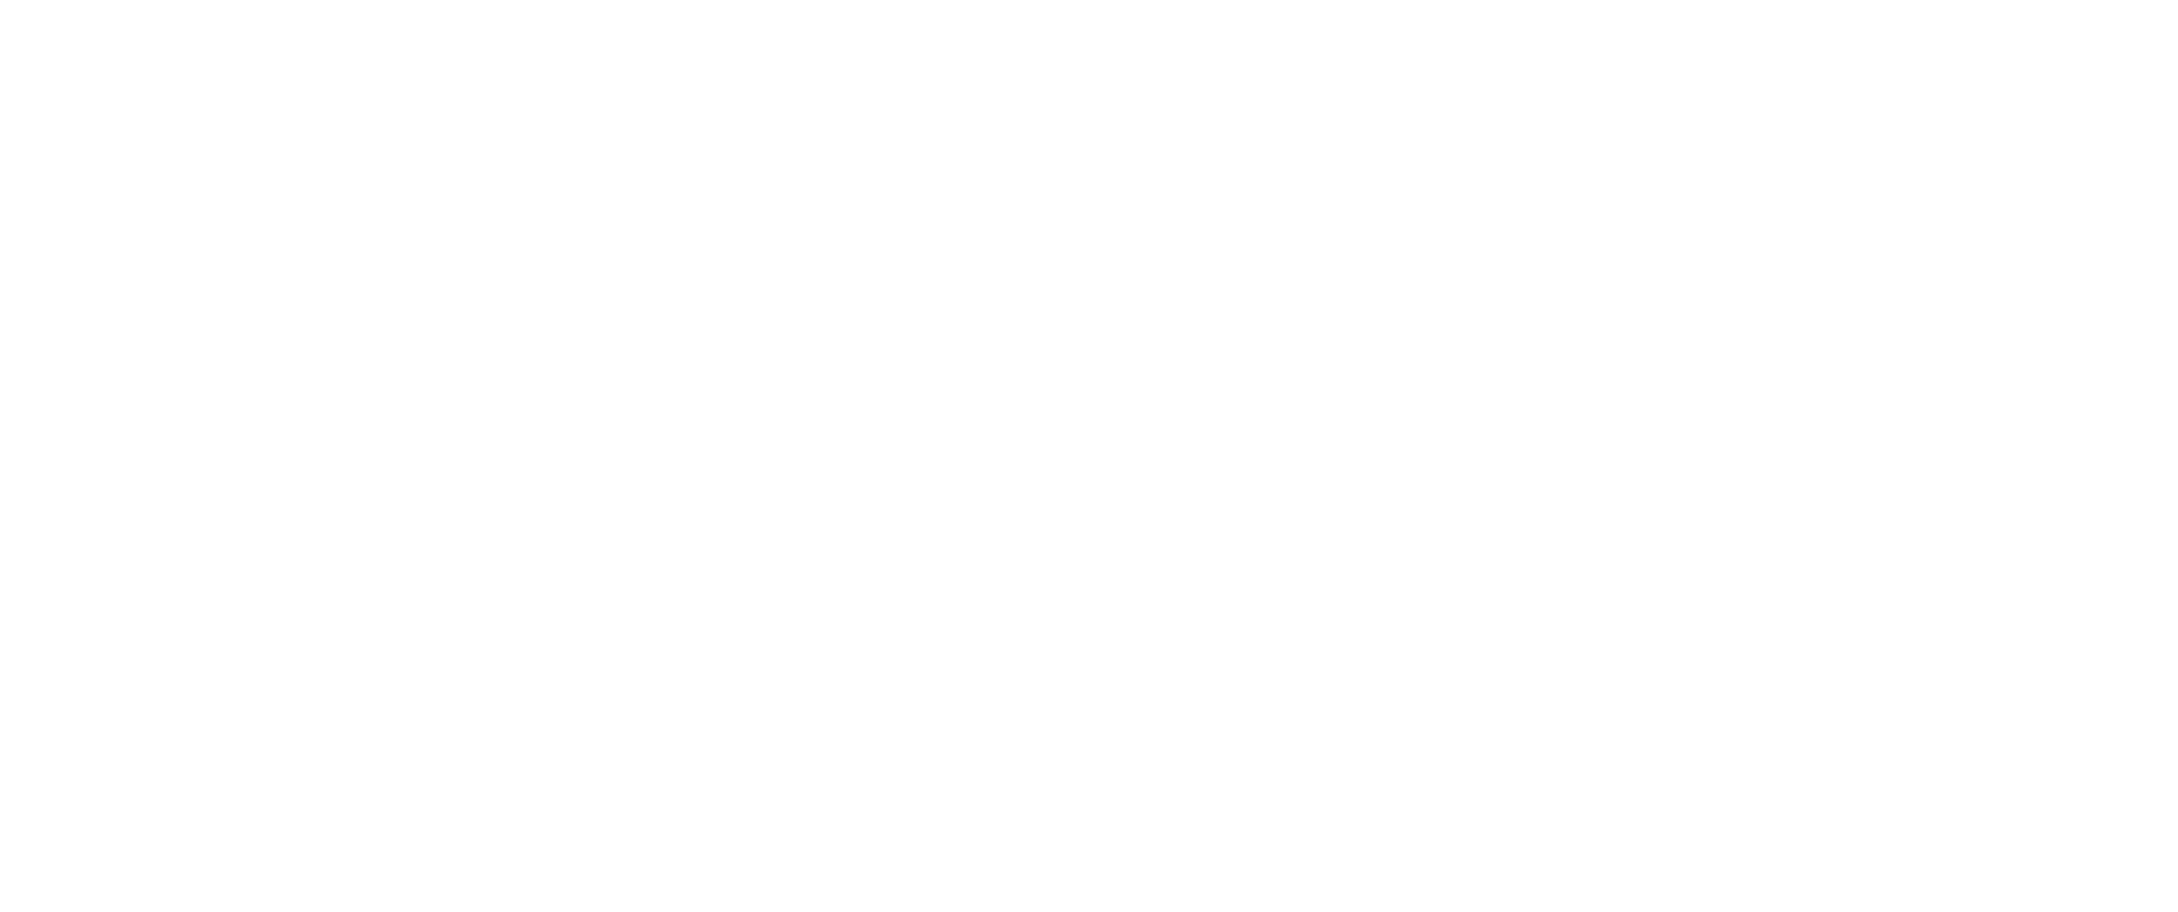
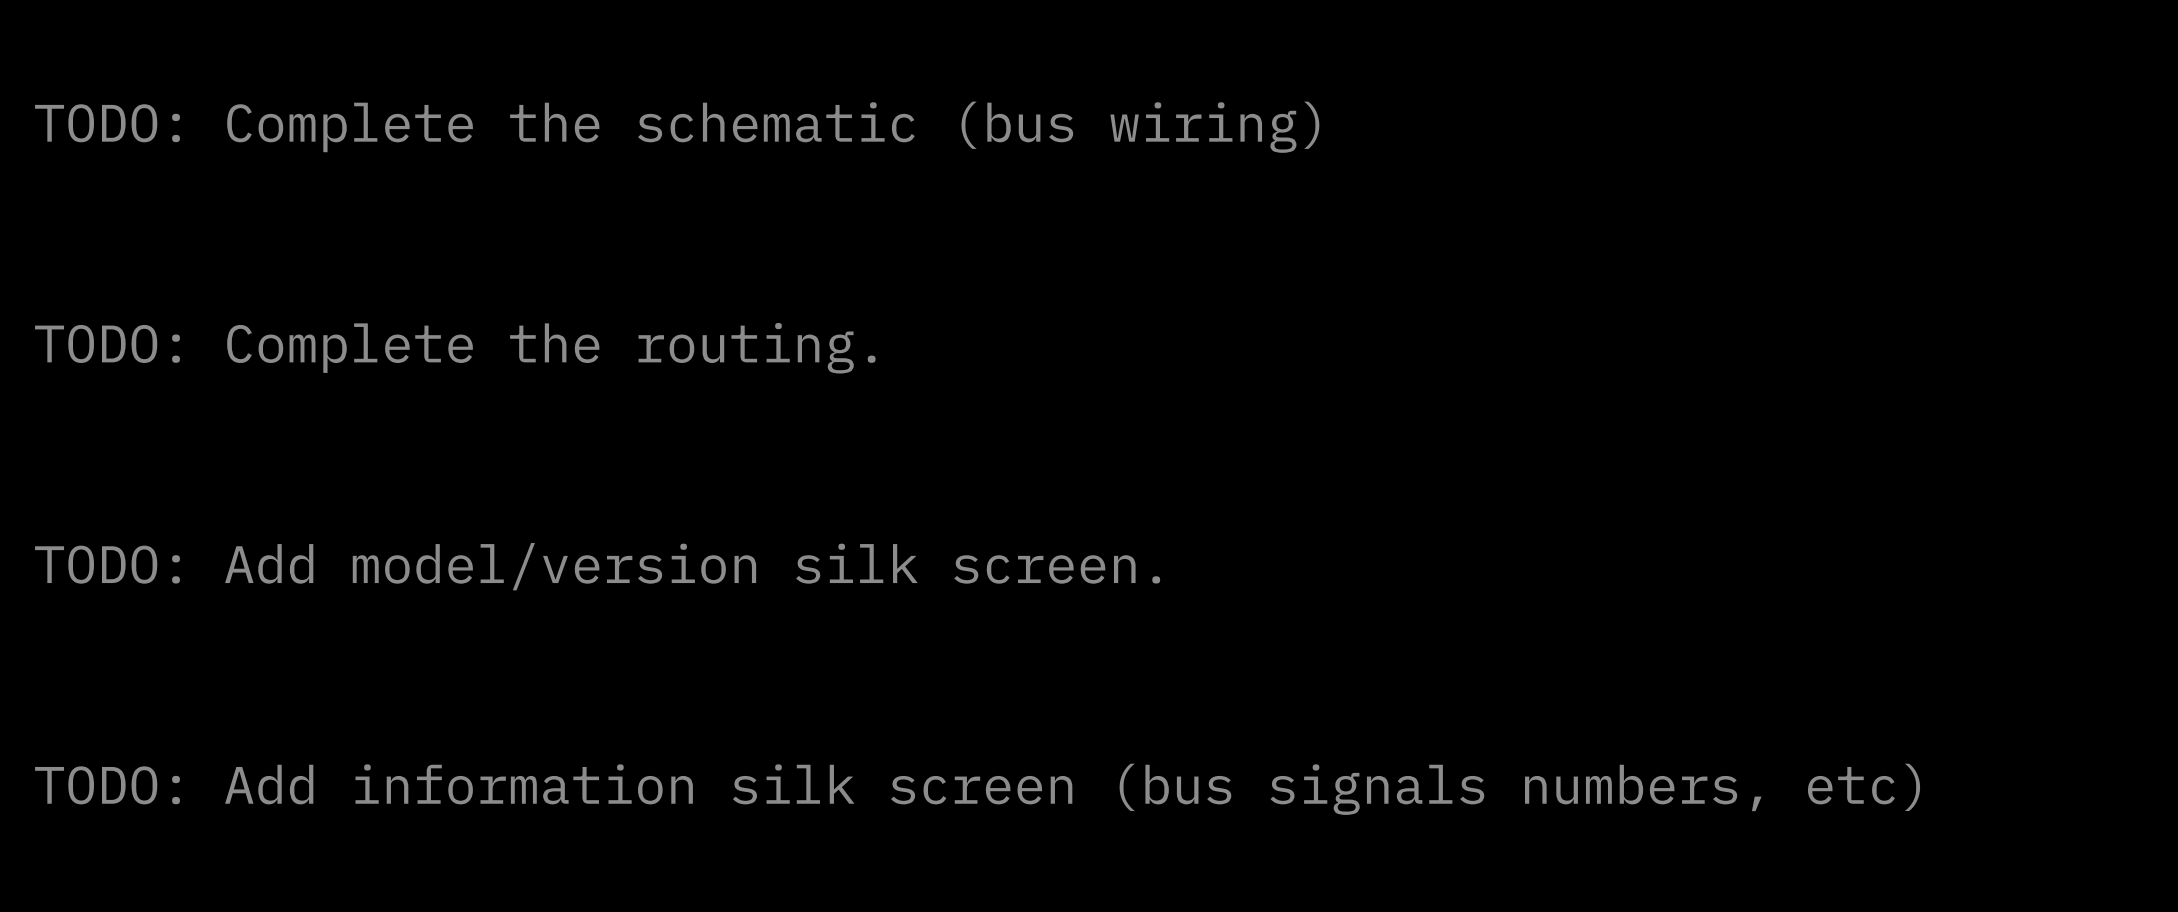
text: none -> TODO: Complete the schematic (bus wiring) (677, 127)
text: none -> TODO: Complete the routing. (455, 348)
text: none -> TODO: Add model/version silk screen. (597, 566)
text: none -> TODO: Add information silk screen (bus signals numbers, etc) (977, 789)

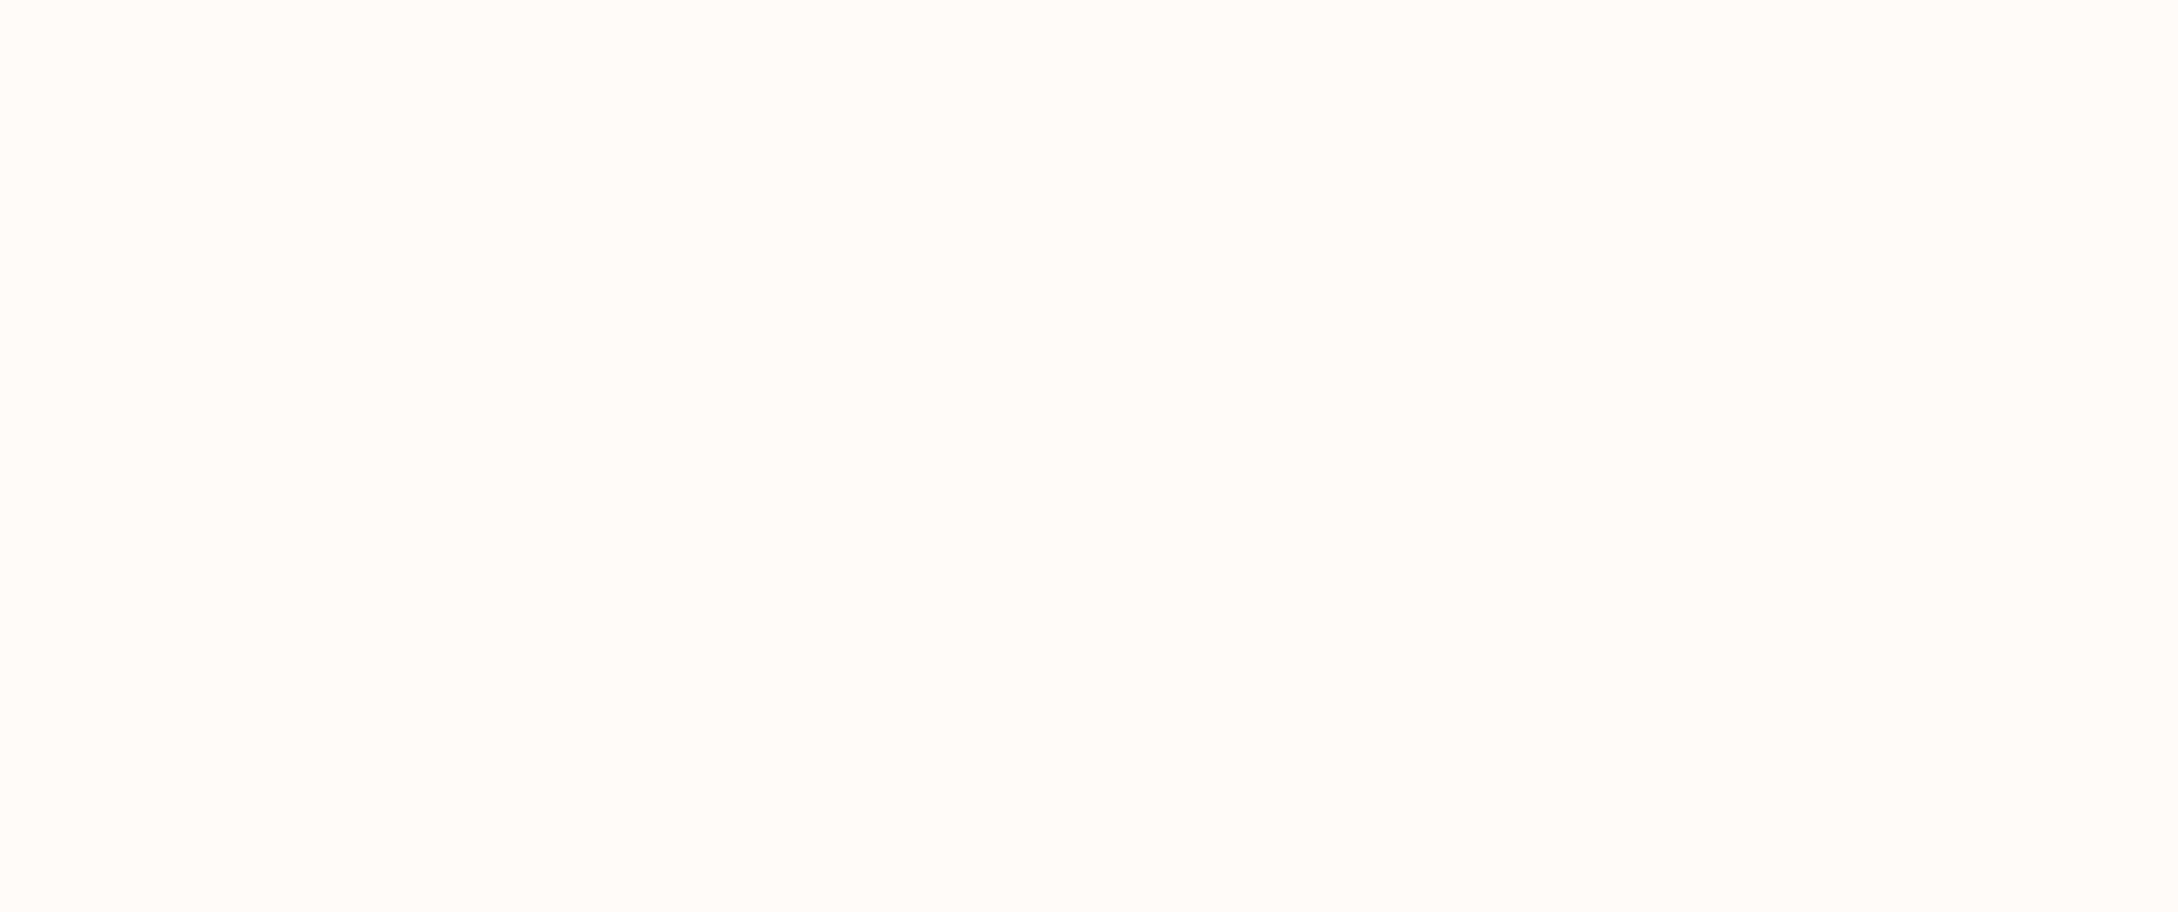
text: TODO: Complete the schematic (bus wiring) (677, 127) -> none
text: TODO: Complete the routing. (455, 348) -> none
text: TODO: Add model/version silk screen. (597, 566) -> none
text: TODO: Add information silk screen (bus signals numbers, etc) (977, 789) -> none

